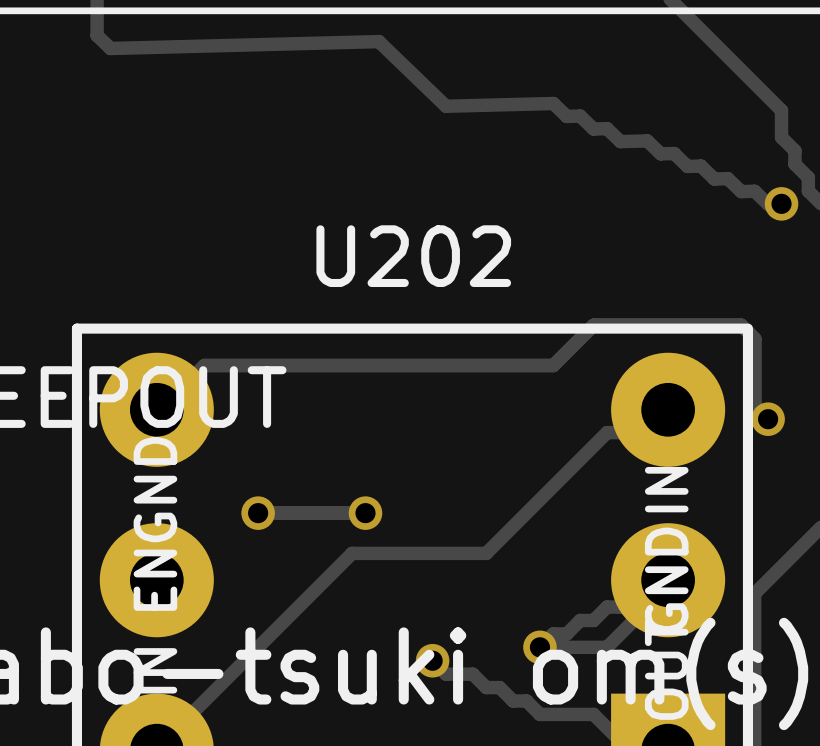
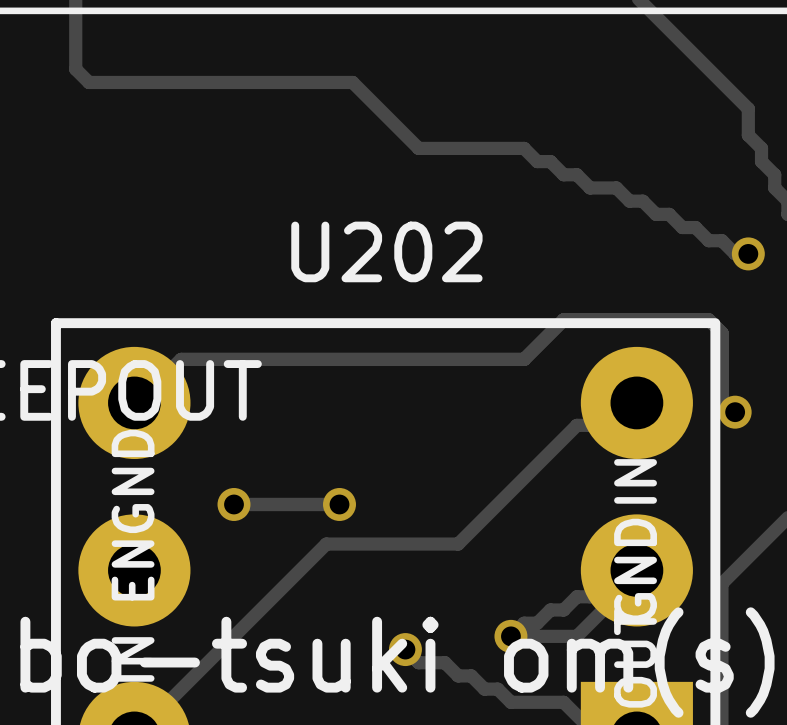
track: (97, 35) (110, 48) (378, 41) (446, 106) (553, 103) (566, 116) (580, 116) (593, 129) (607, 128) (620, 141) (647, 140) (660, 153) (674, 153) (687, 166) (701, 166) (714, 179) (727, 178) (741, 191) (754, 191) (768, 204) (781, 203) -> (75, 35) (75, 69) (88, 82) (352, 82) (418, 148) (524, 148) (537, 161) (550, 161) (563, 174) (576, 174) (590, 187) (616, 187) (629, 201) (642, 201) (656, 214) (669, 214) (682, 227) (695, 227) (708, 240) (721, 240) (735, 253) (748, 253)
via: (781, 203) -> none
via: none -> (748, 253)

